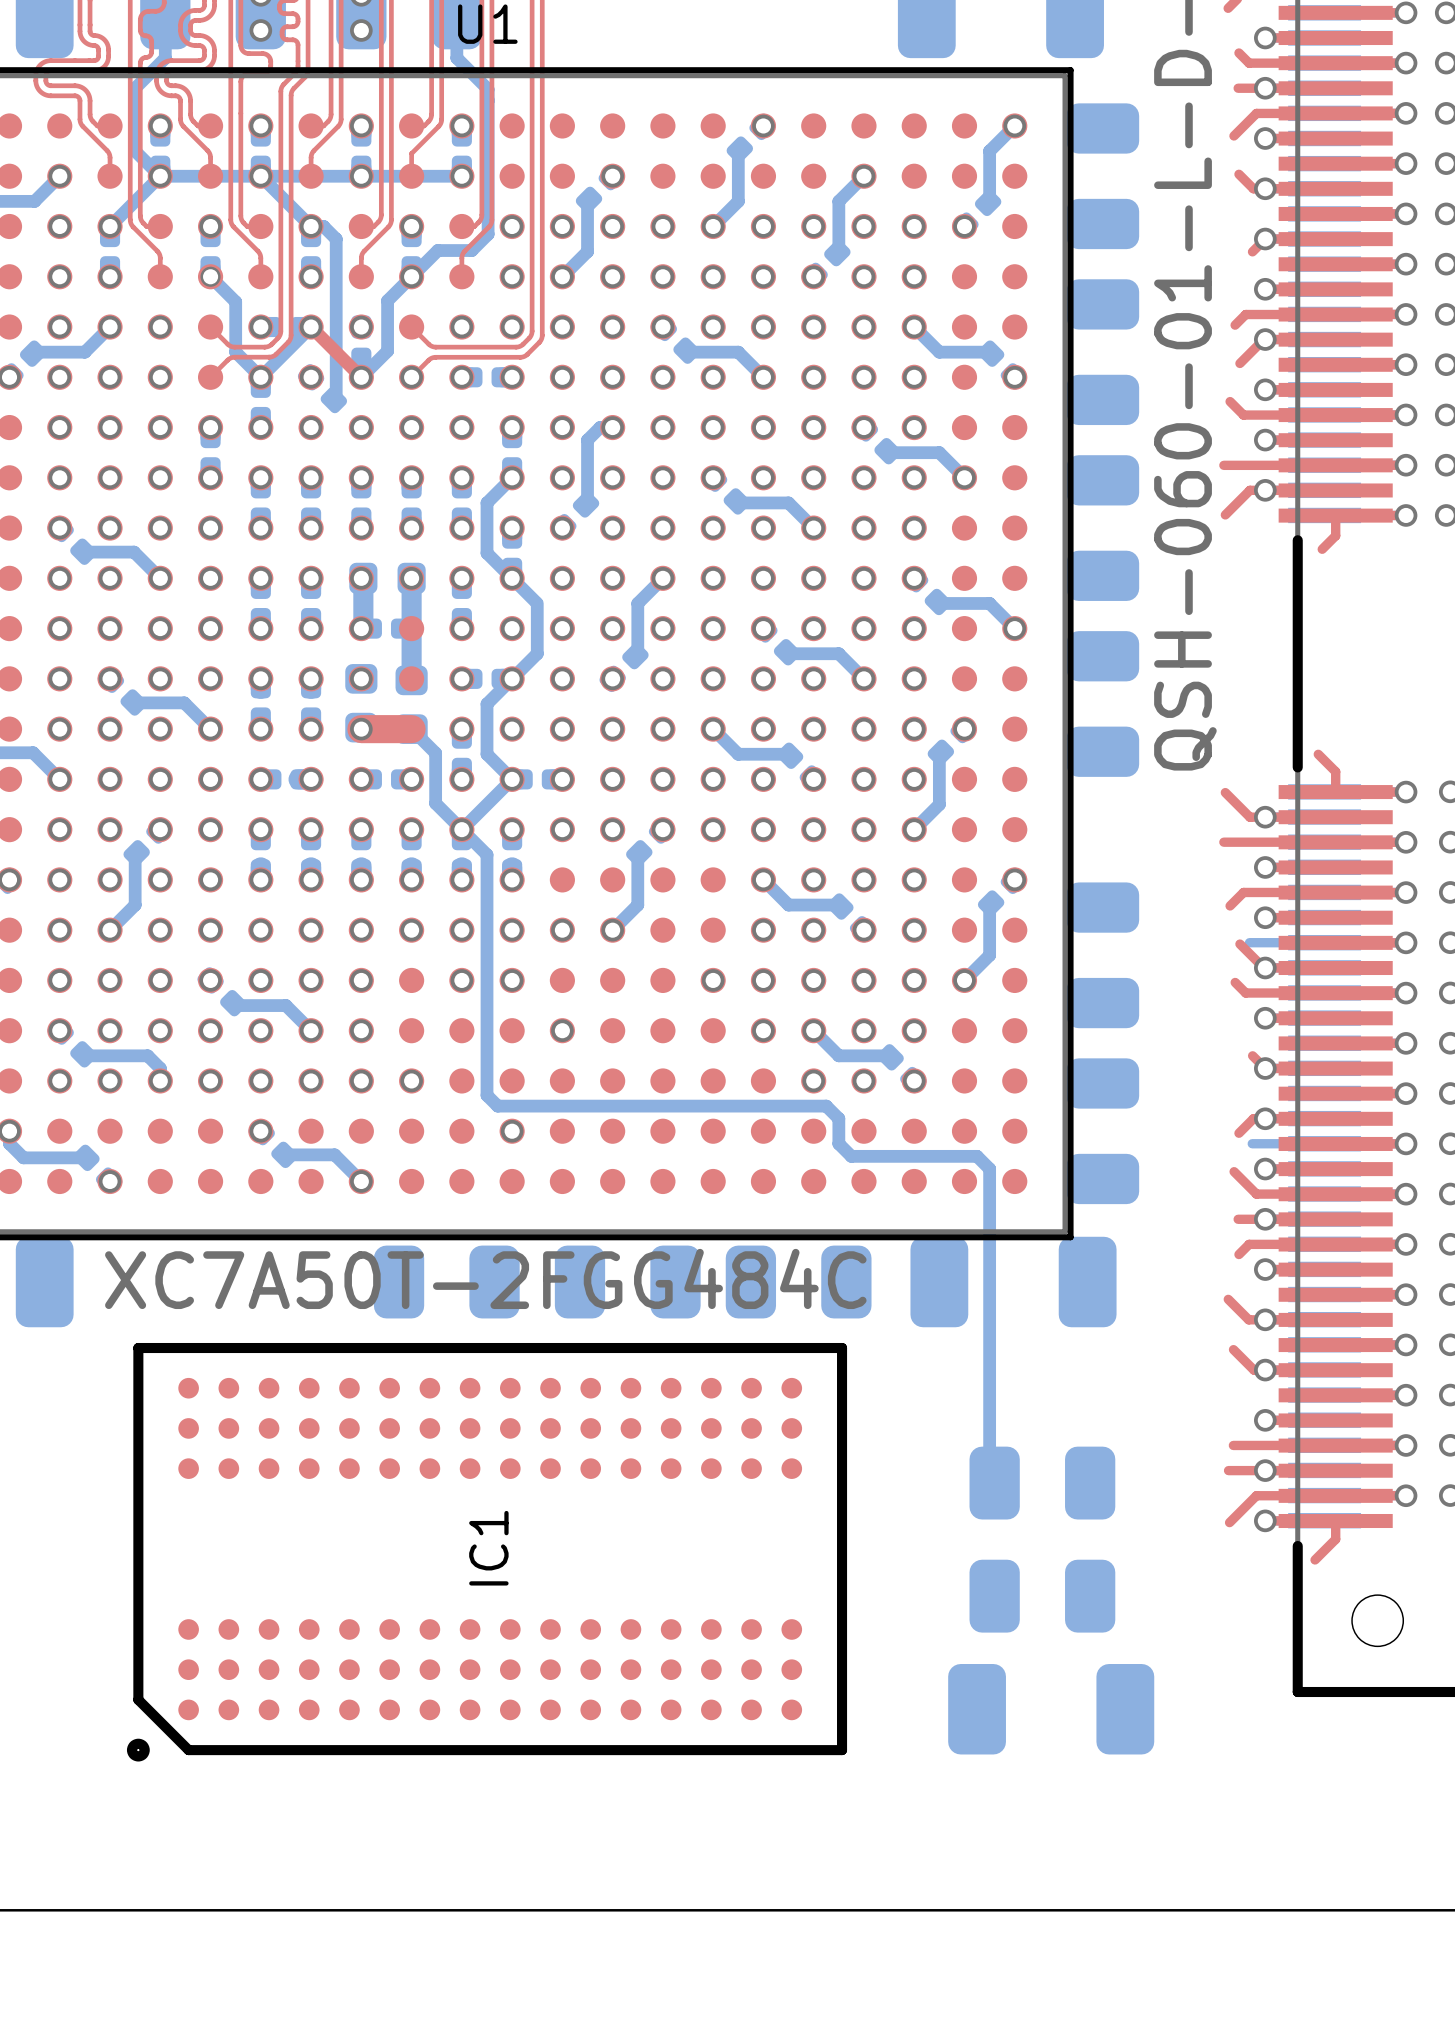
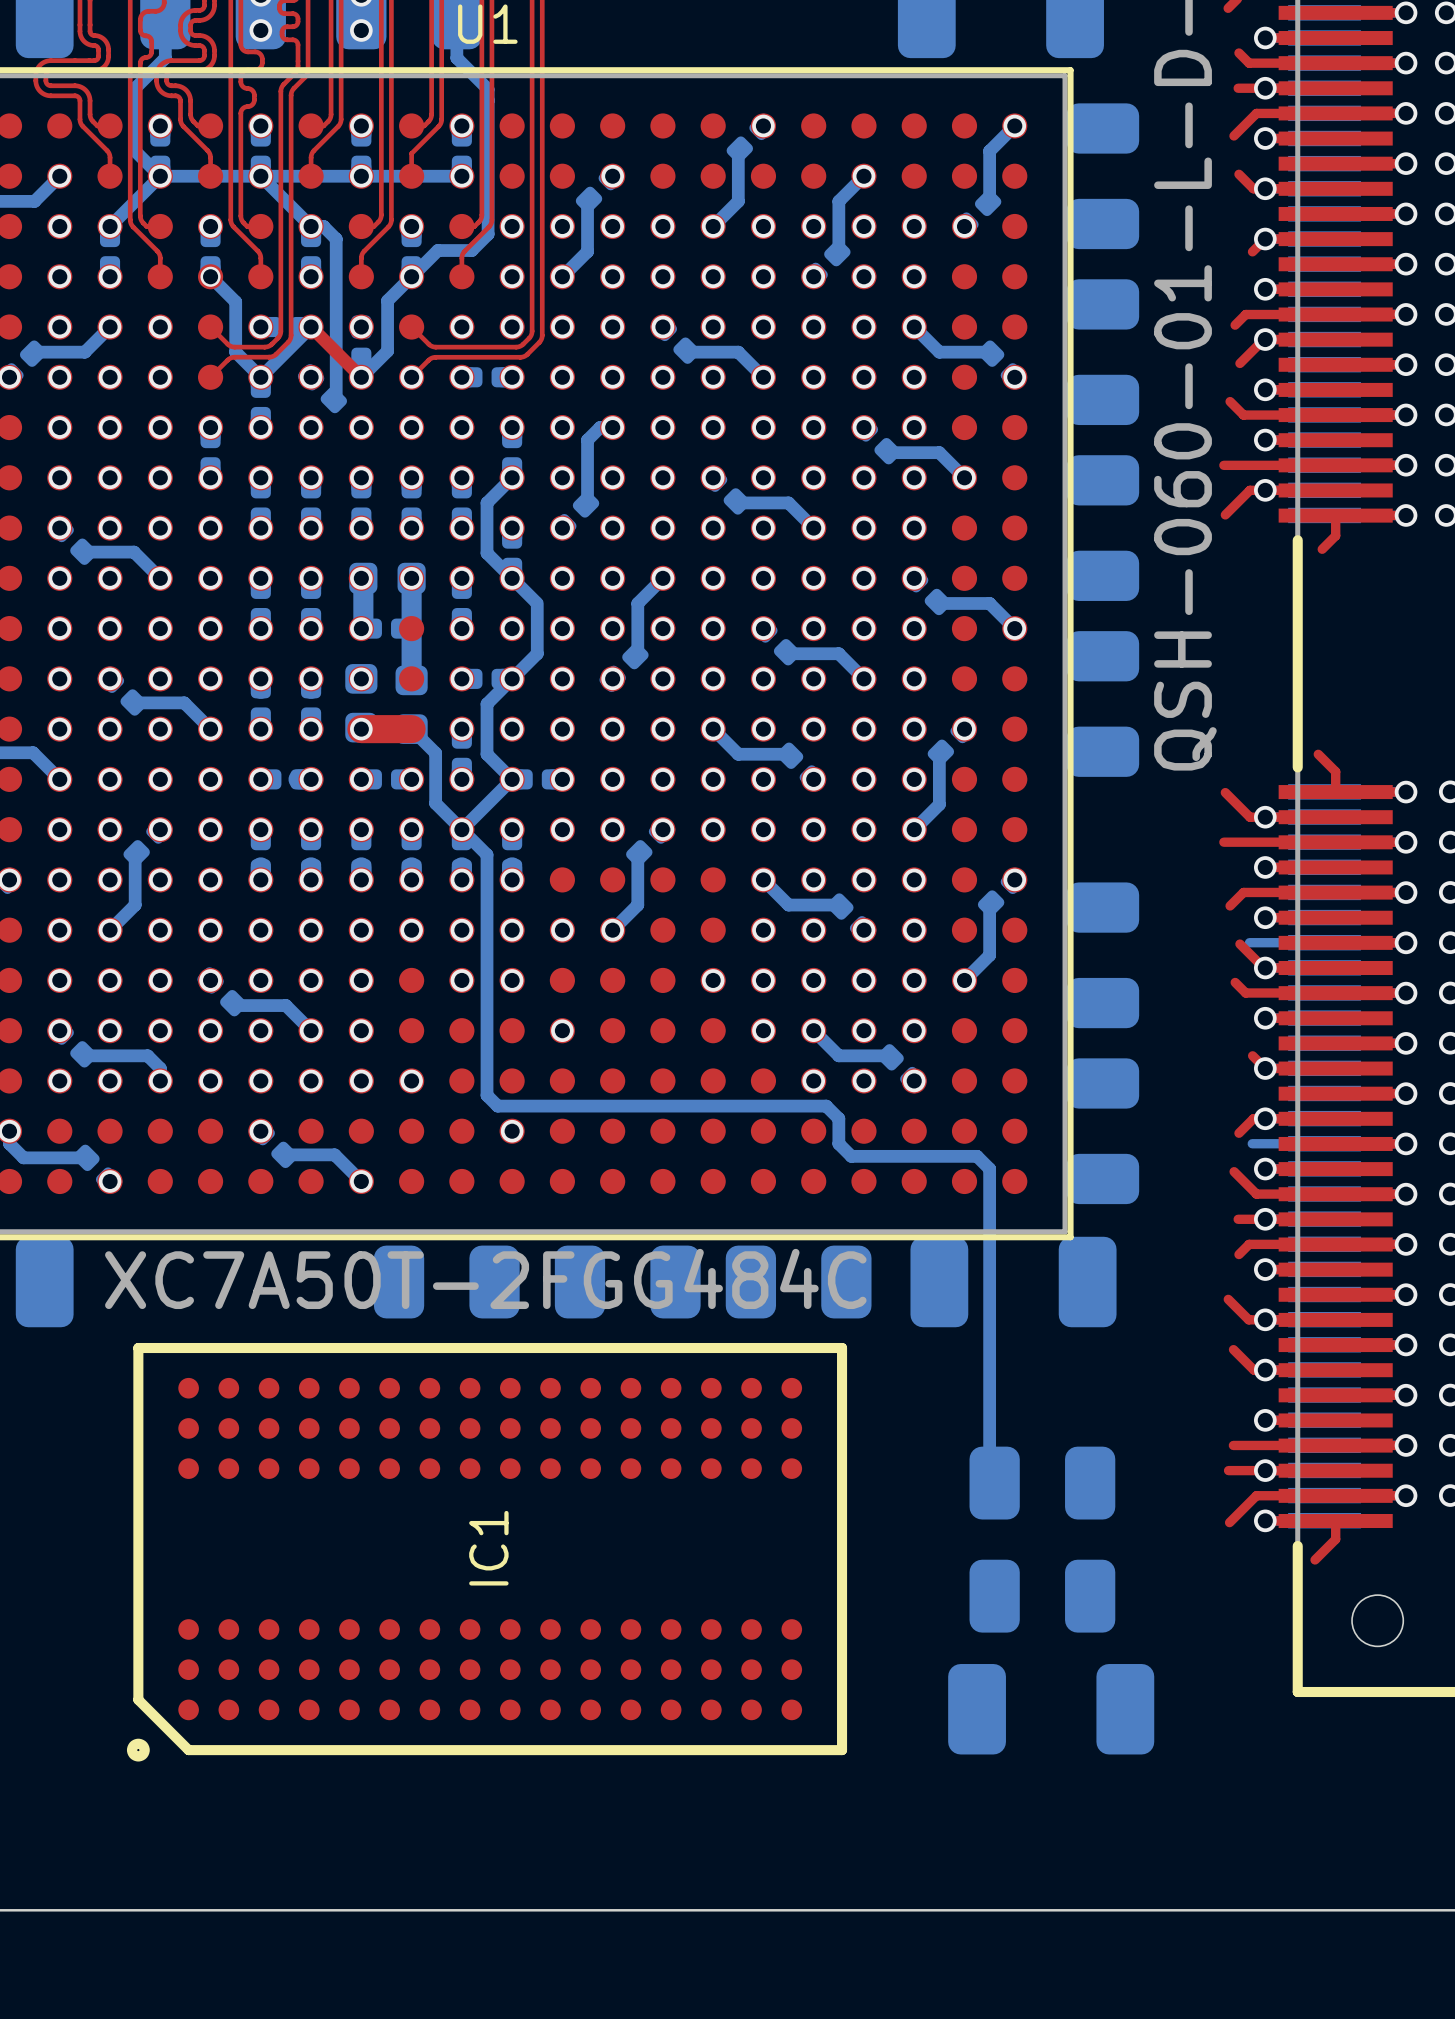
top track: (240, 45) (244, 52) (265, 54) (270, 61) (270, 68) (266, 72) (246, 73) (241, 77) (240, 113) -> (240, 44) (245, 51) (259, 53) (262, 59) (259, 68) (246, 70) (241, 74) (241, 84) (252, 91) (254, 99) (252, 104) (243, 108) (240, 113)

